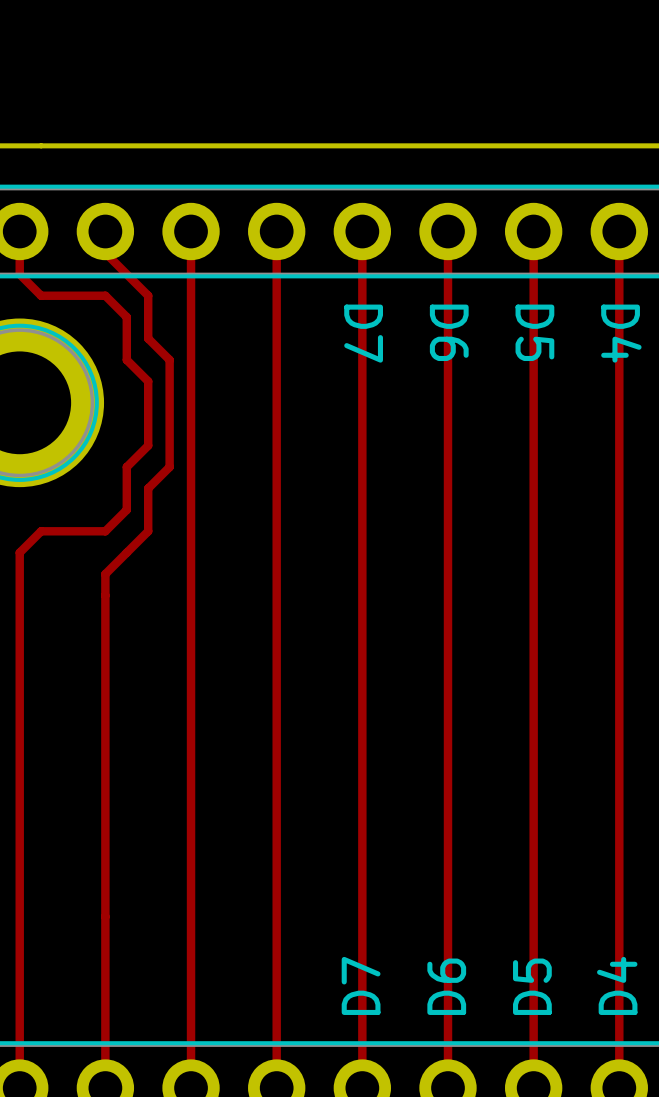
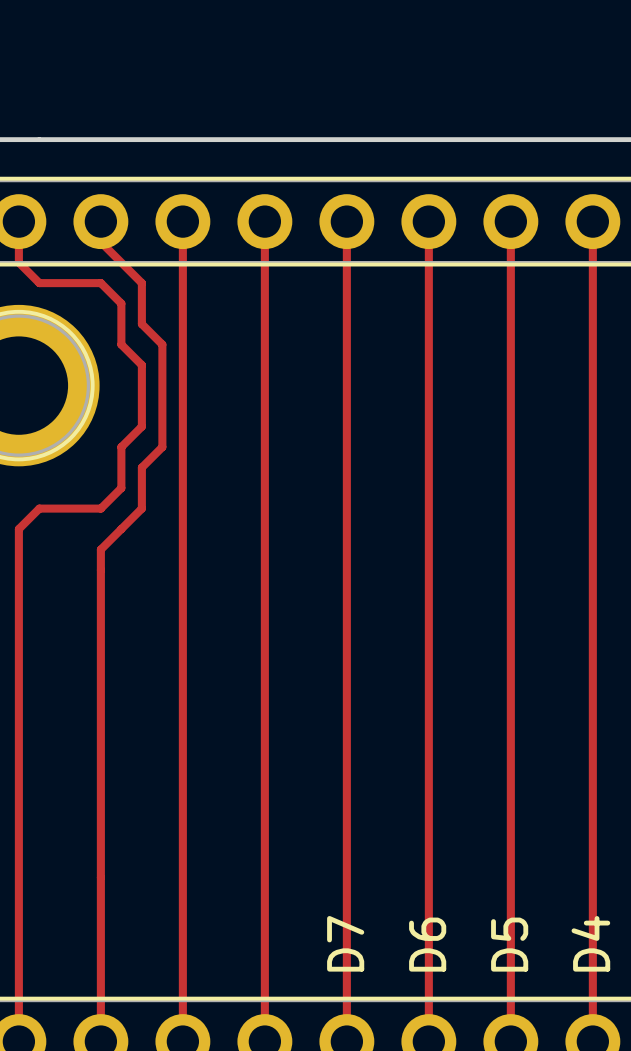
text: D6 (449, 332) -> none
text: D5 (534, 332) -> none
text: D7 (363, 333) -> none
text: D4 (621, 333) -> none

